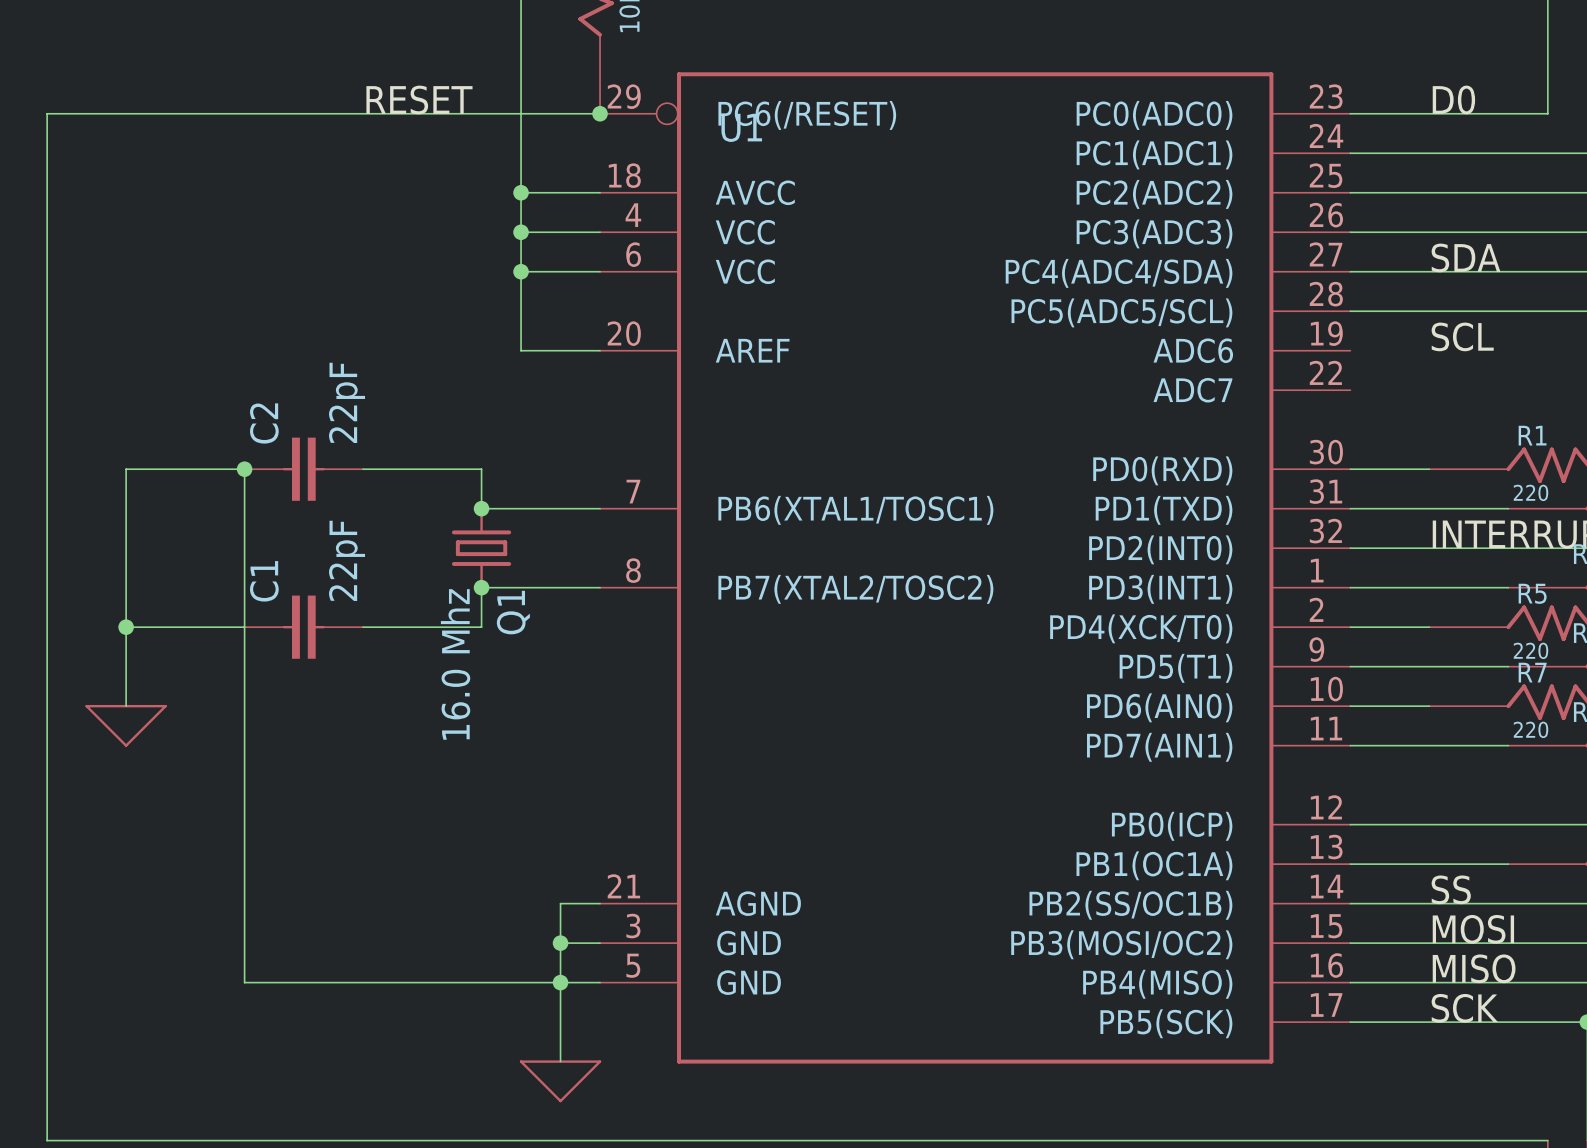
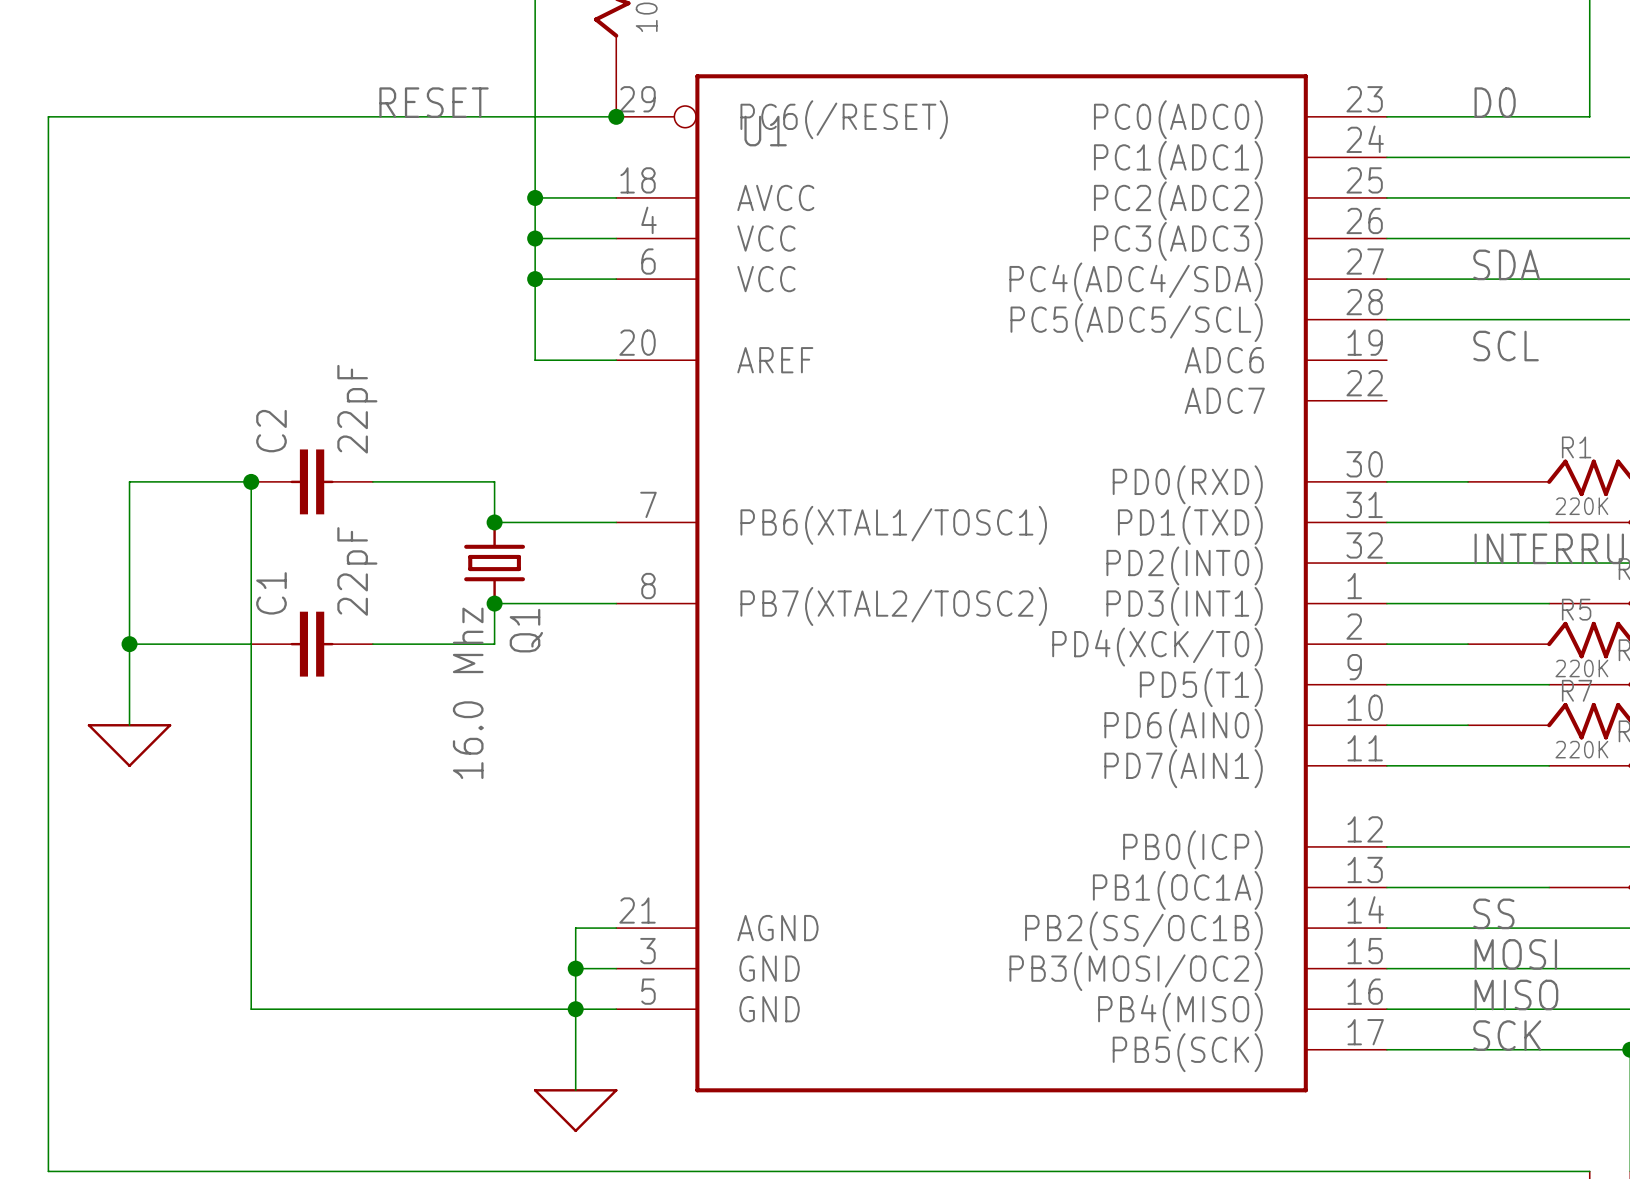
R1 value: 220 (1530, 492) -> 220K (1581, 506)
R5 value: 220 (1530, 650) -> 220K (1581, 668)
R7 value: 220 (1530, 729) -> 220K (1581, 749)

